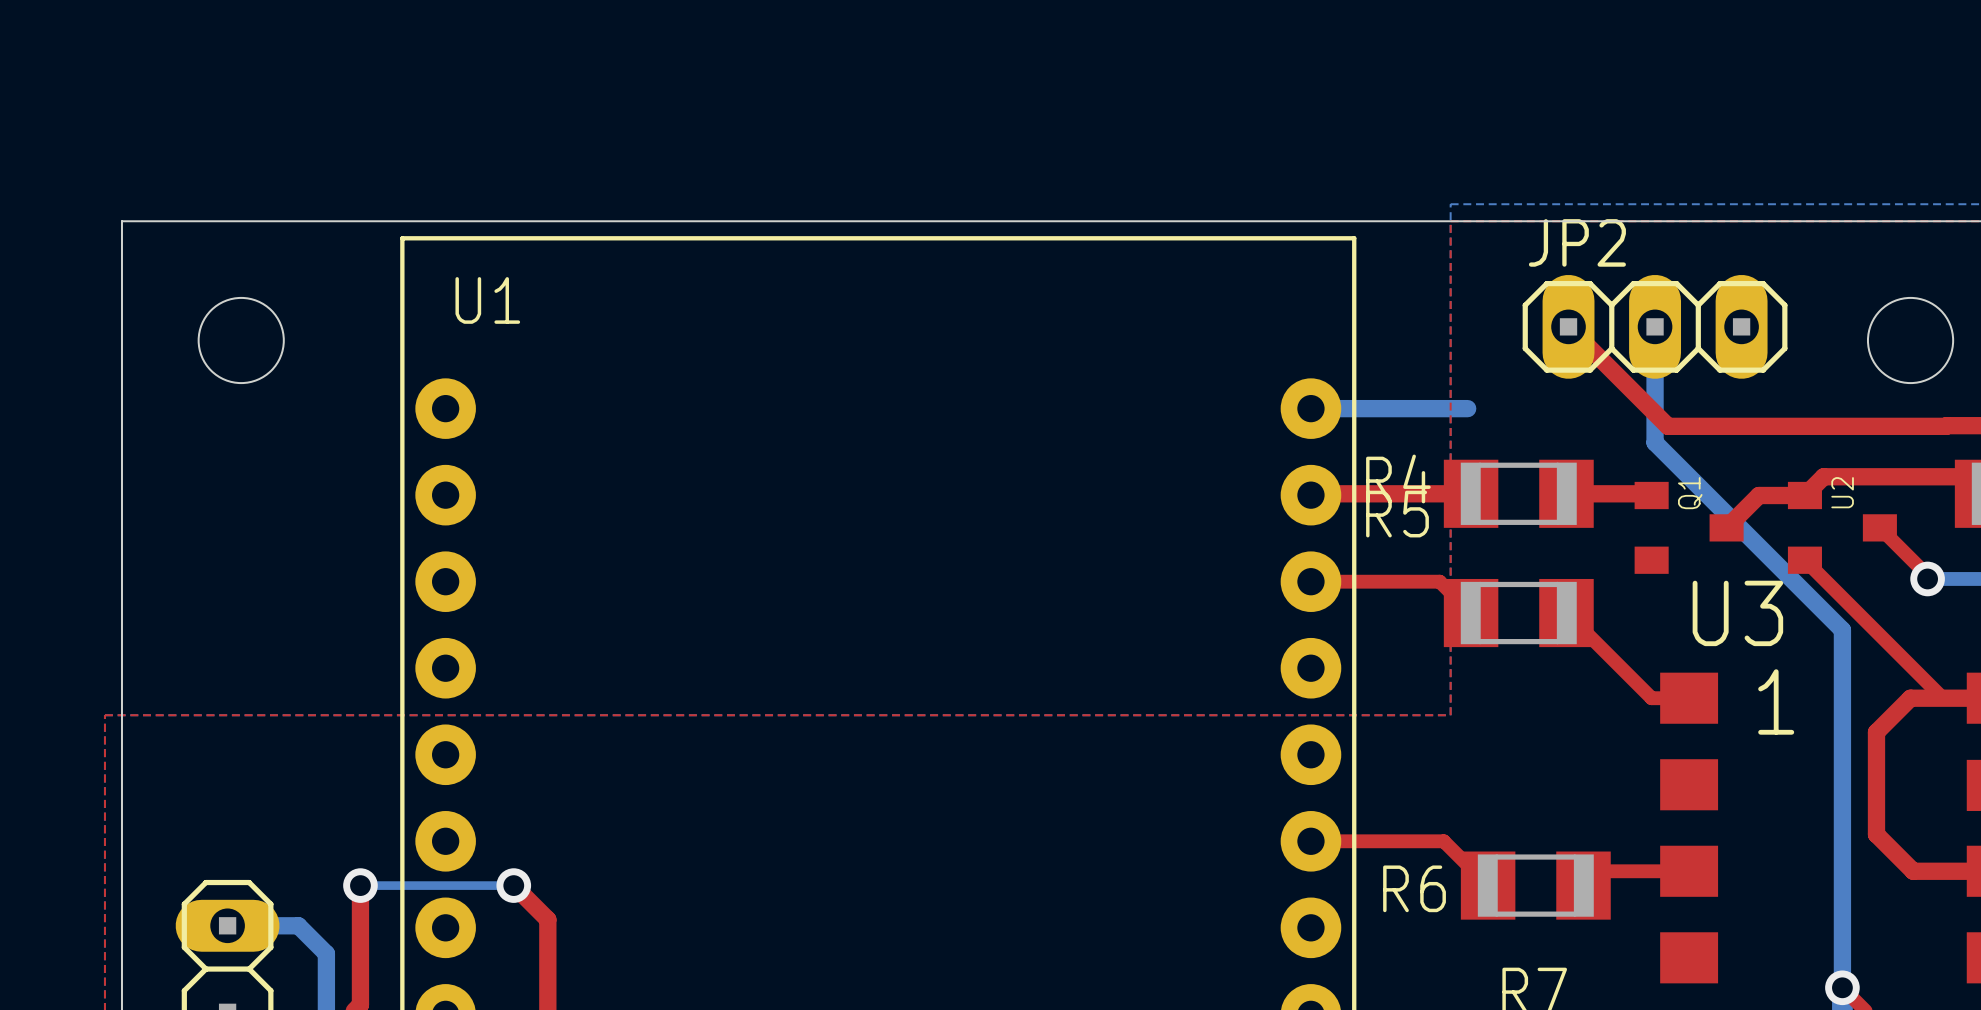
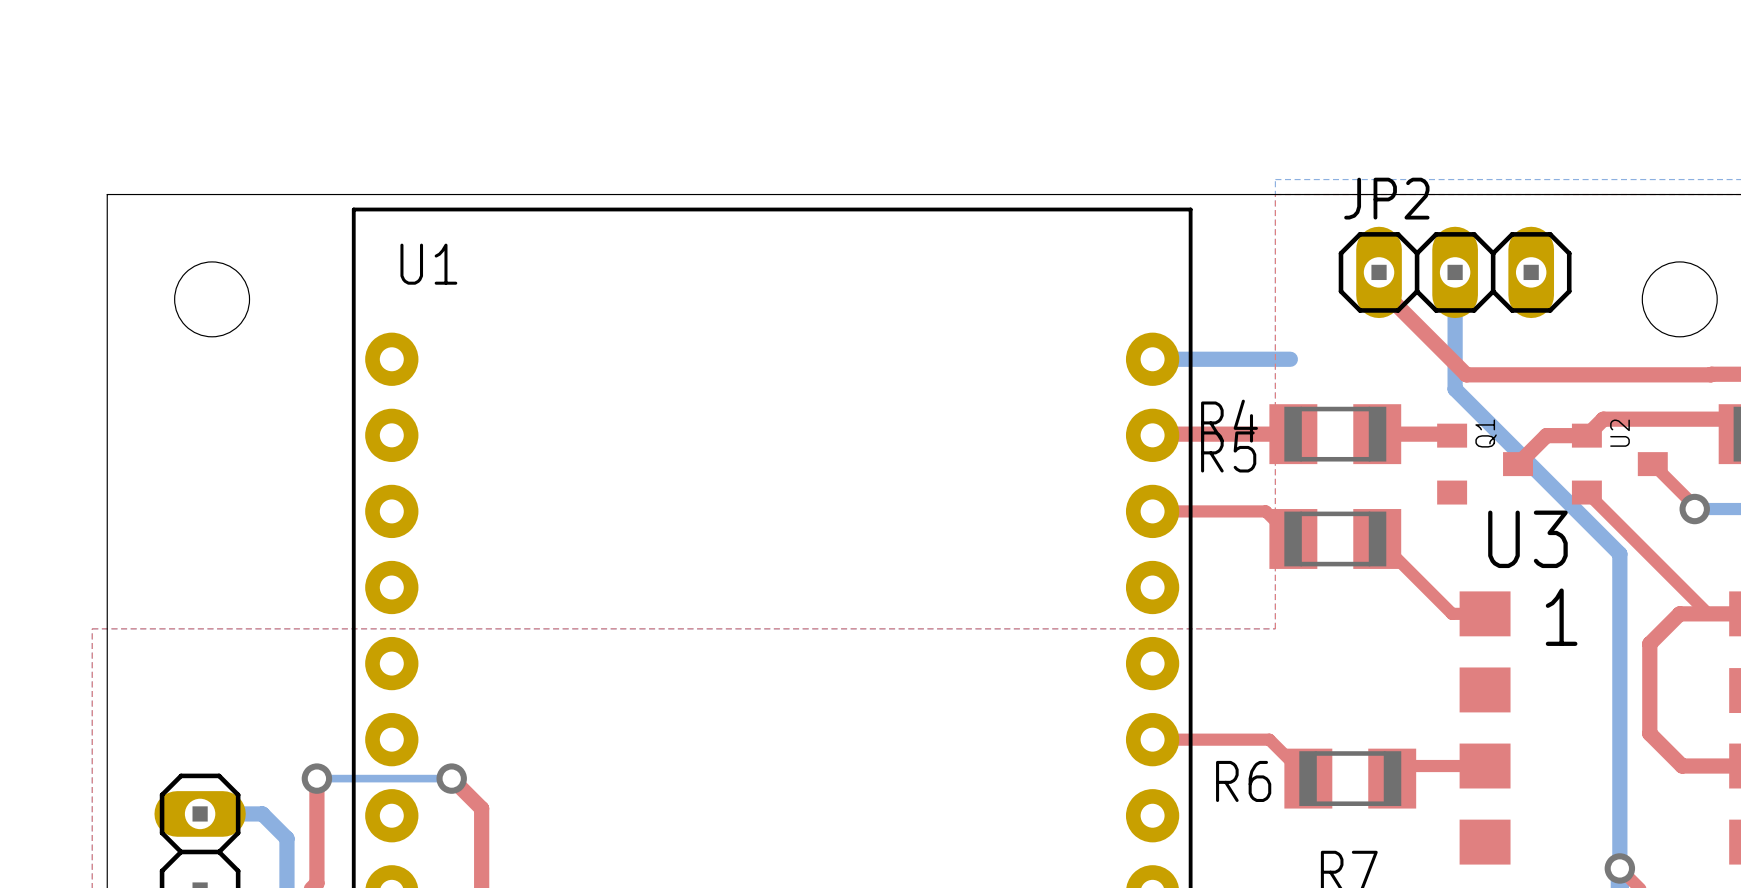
JP2 position: (1655, 326) -> (1455, 272)

